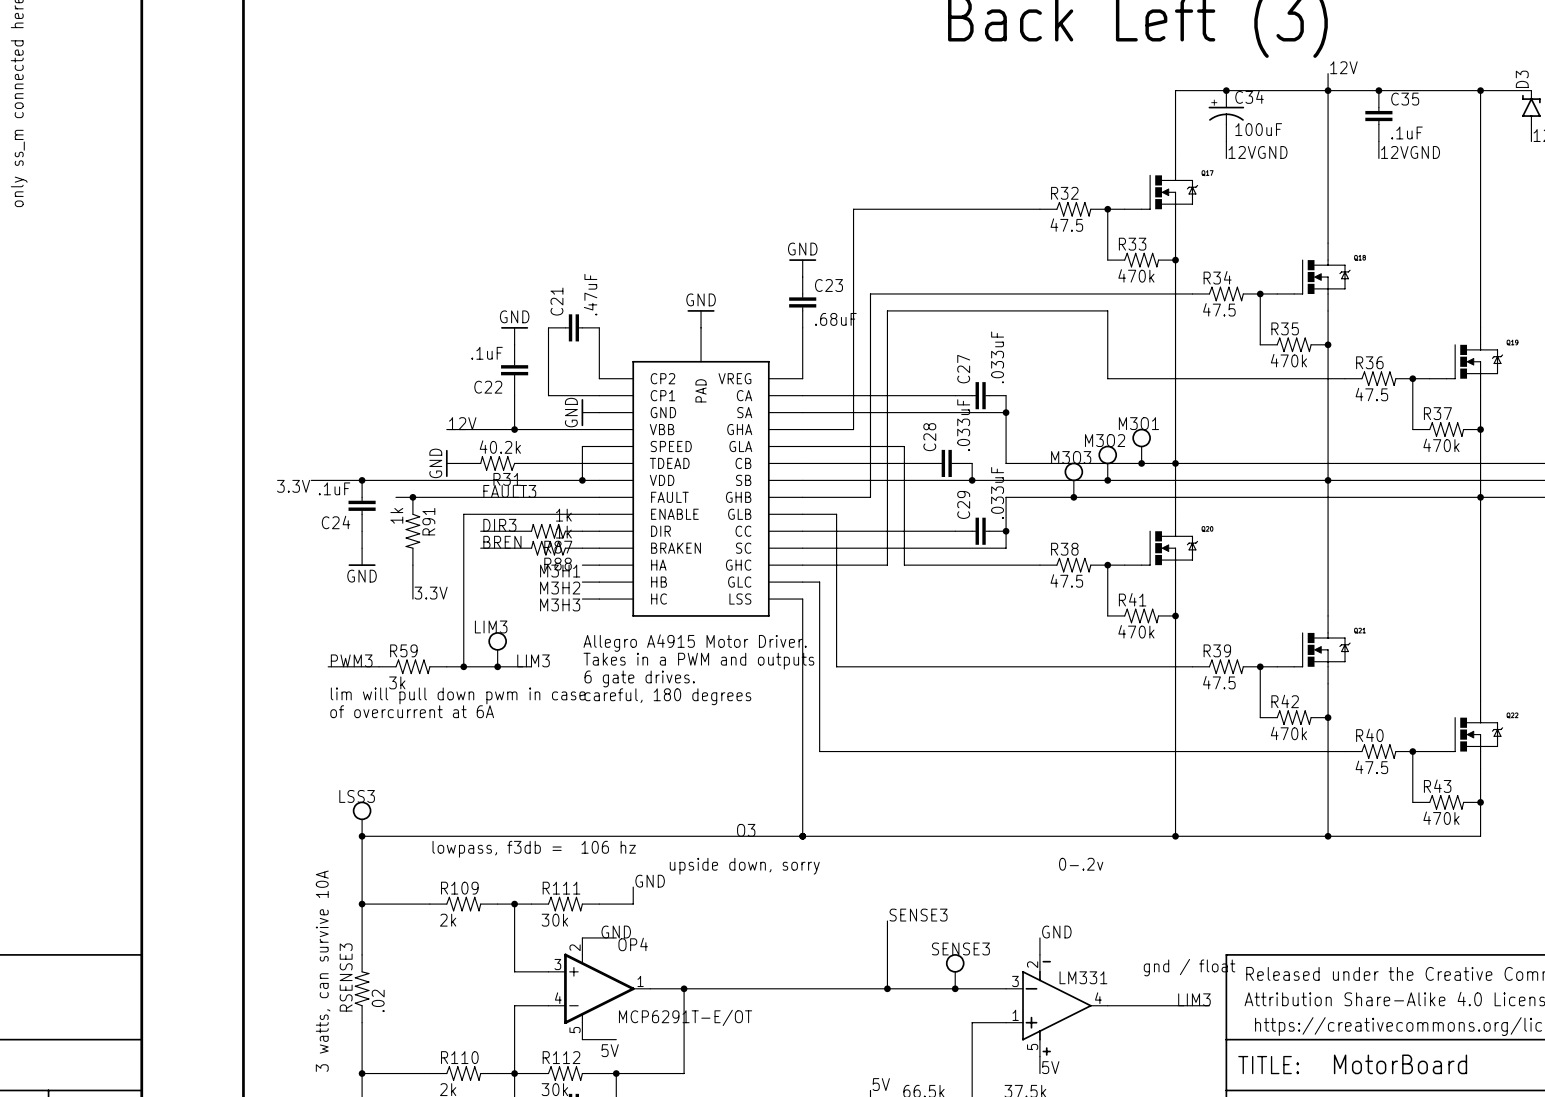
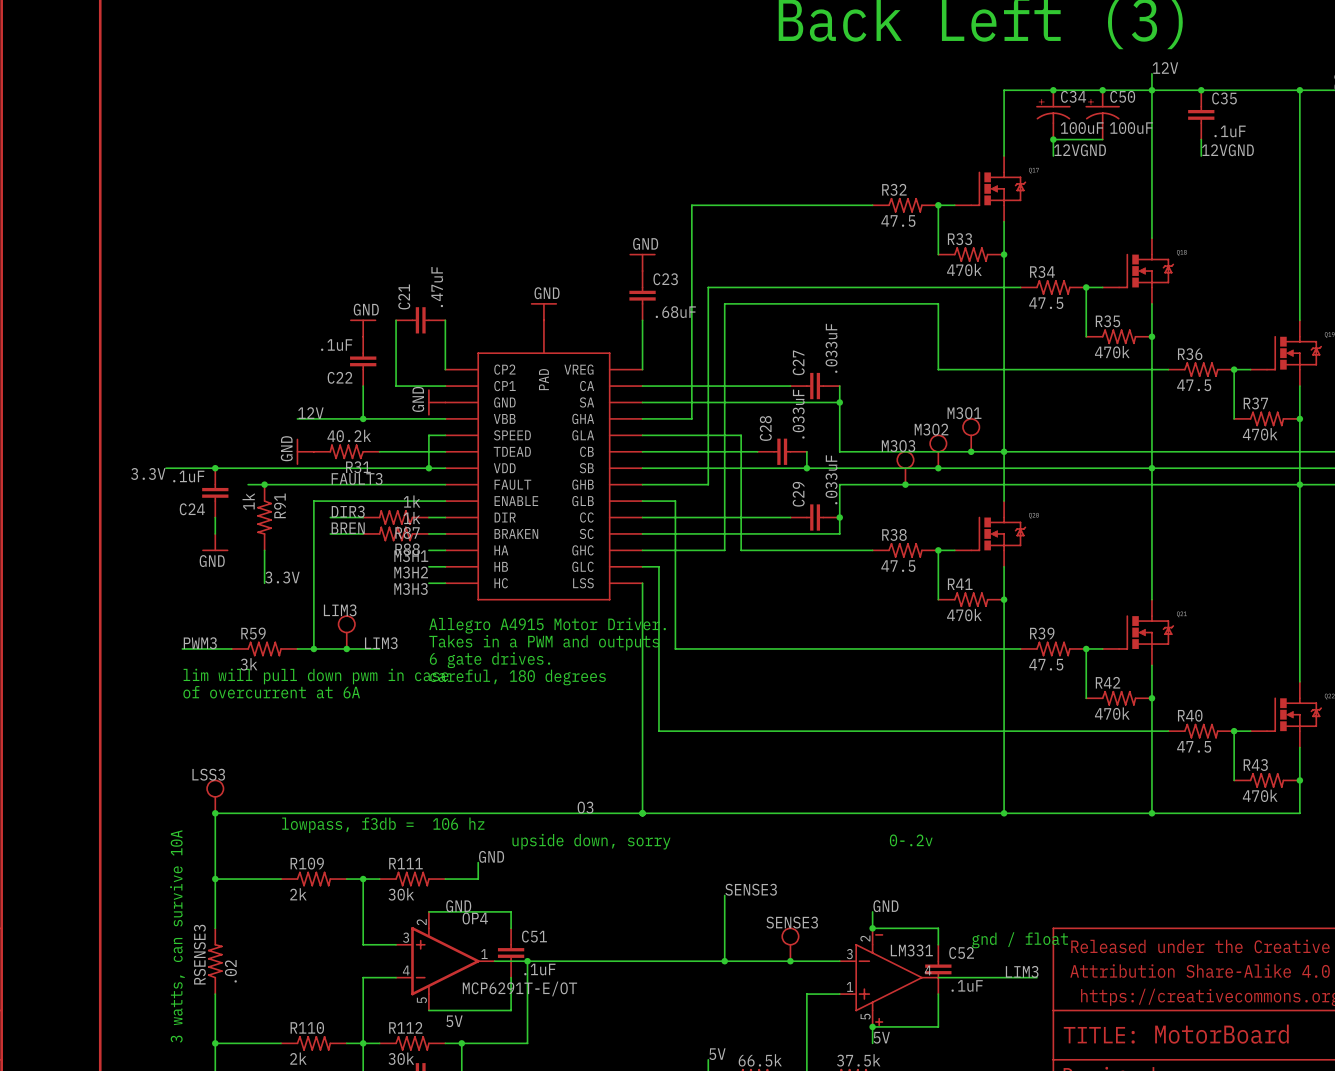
junction: none -> (1102, 90)
C50: none -> 100uF (1102, 114)
wire: none -> (1053, 139) (1102, 139)
junction: none -> (1053, 139)
wire: none -> (461, 911) (511, 911) (511, 928)
wire: none -> (872, 928) (938, 928) (938, 944)
junction: none -> (872, 928)
C51: none -> .1uF (511, 952)
C52: none -> .1uF (938, 969)
wire: none -> (511, 977) (511, 1010) (461, 1010)
wire: none -> (938, 994) (938, 1026) (872, 1026)
junction: none -> (872, 1026)

